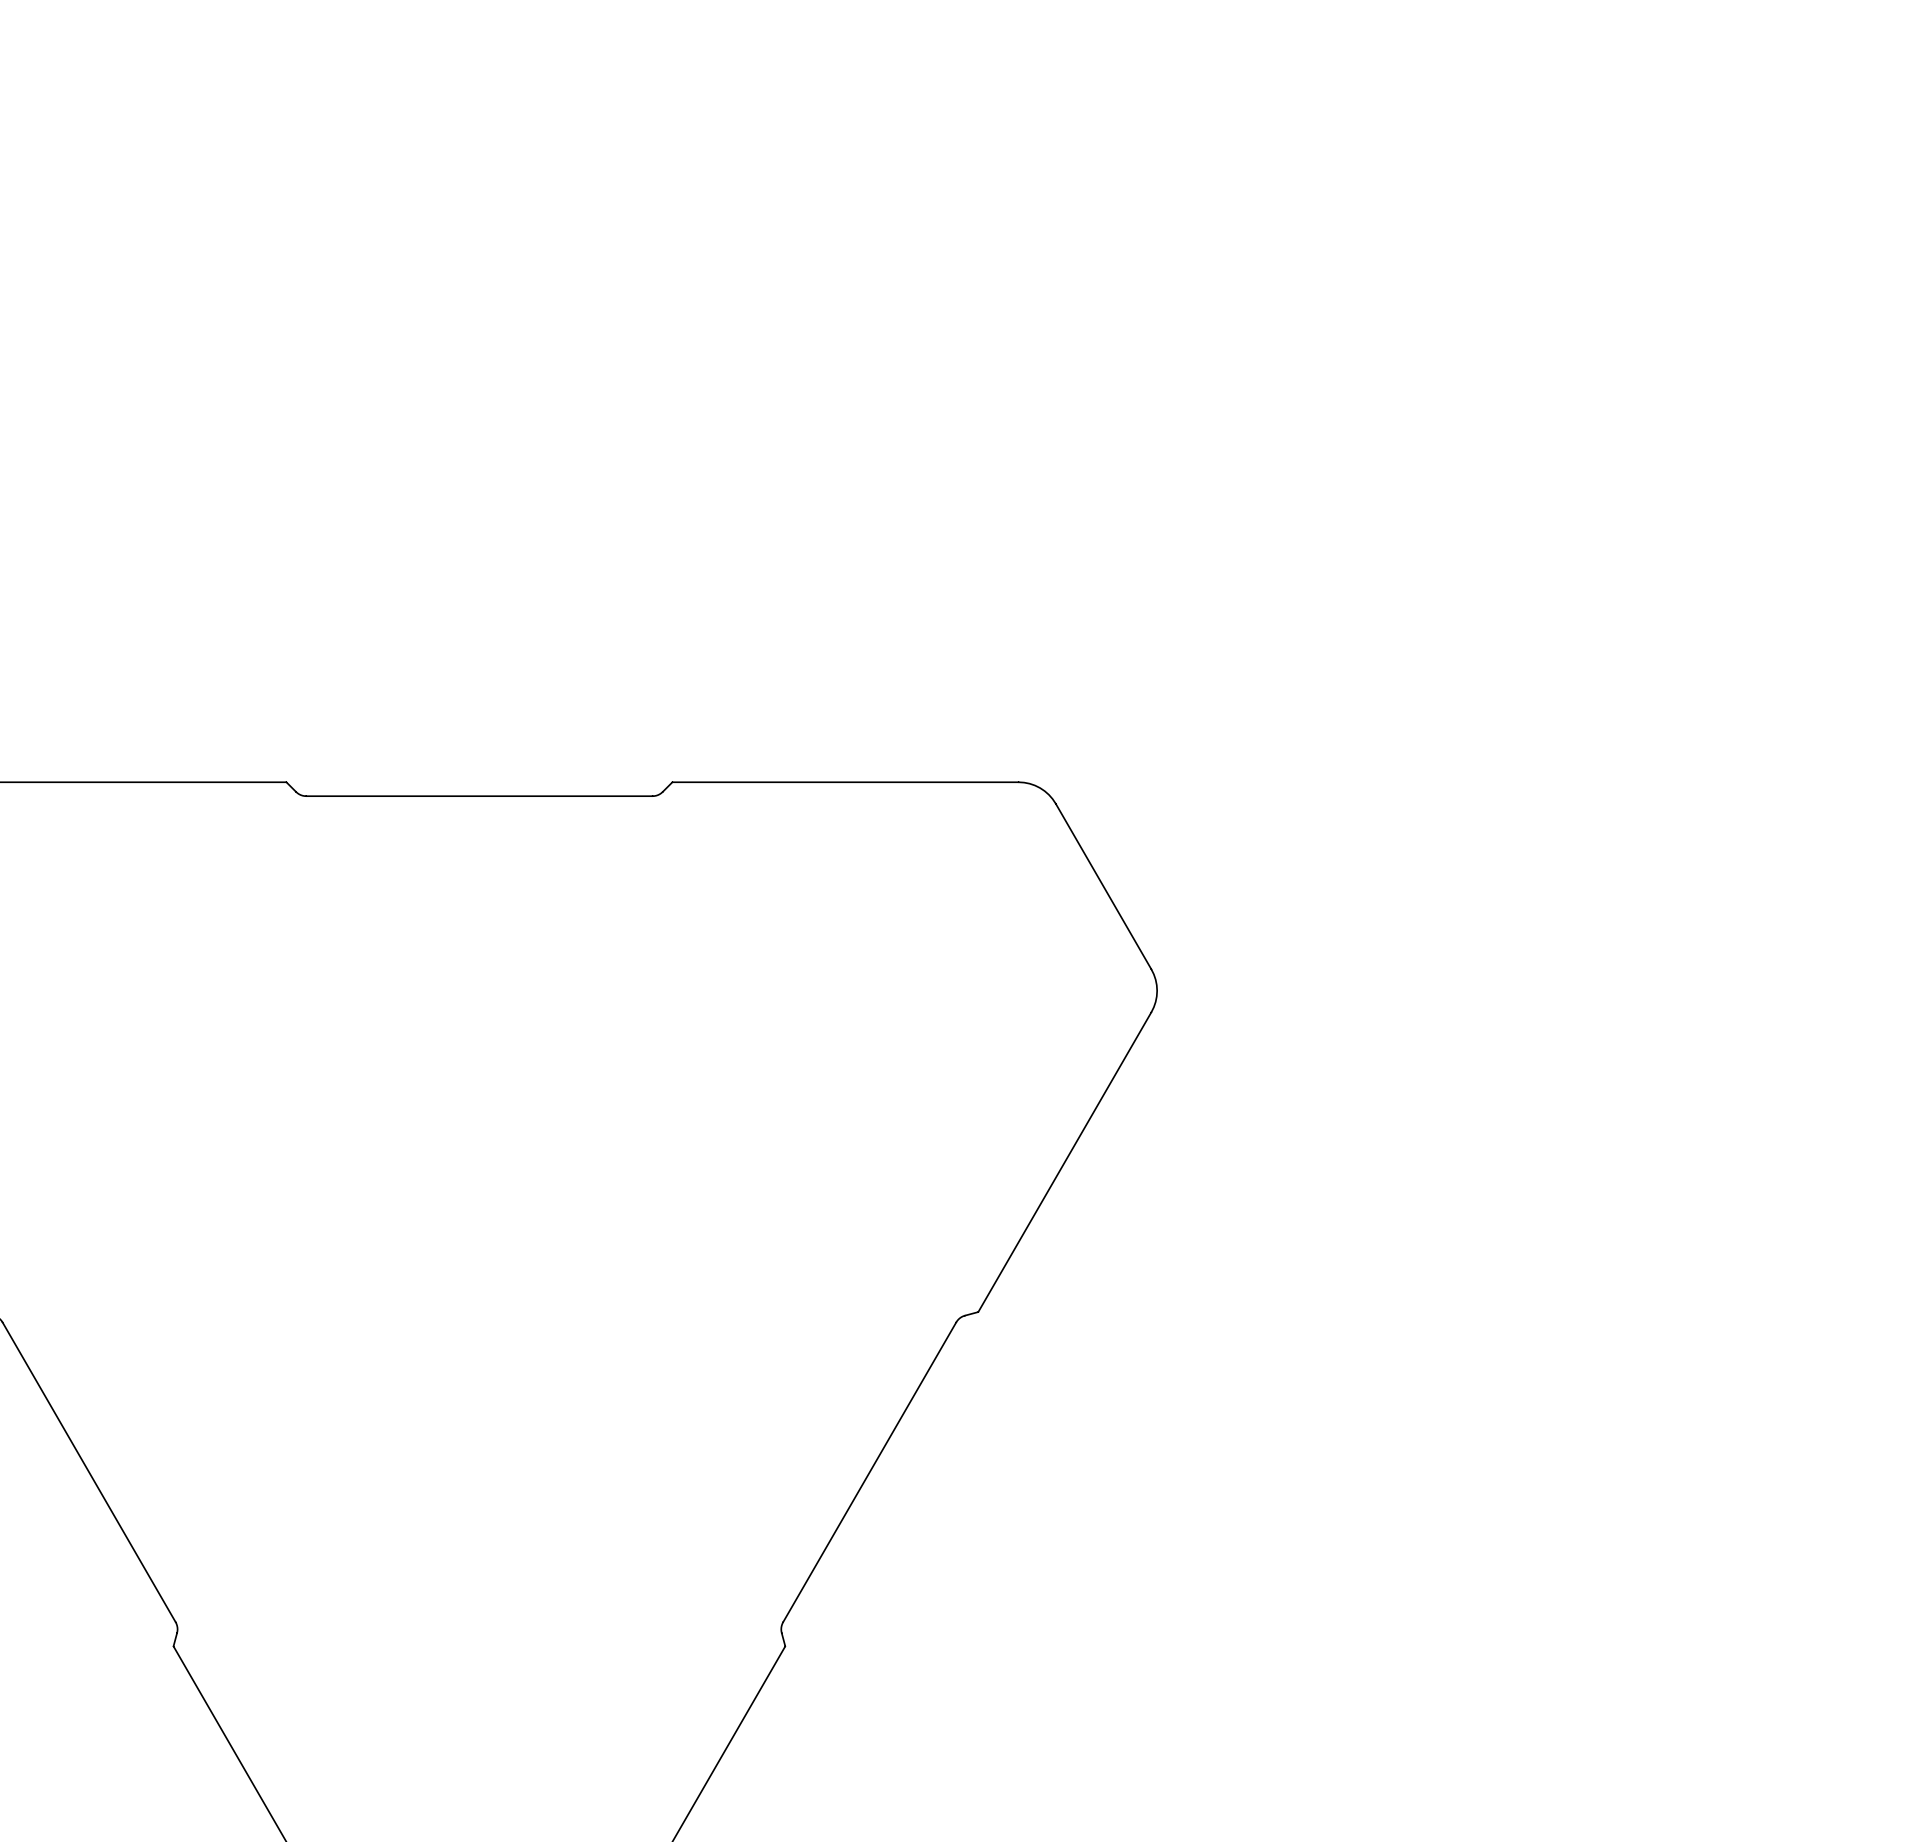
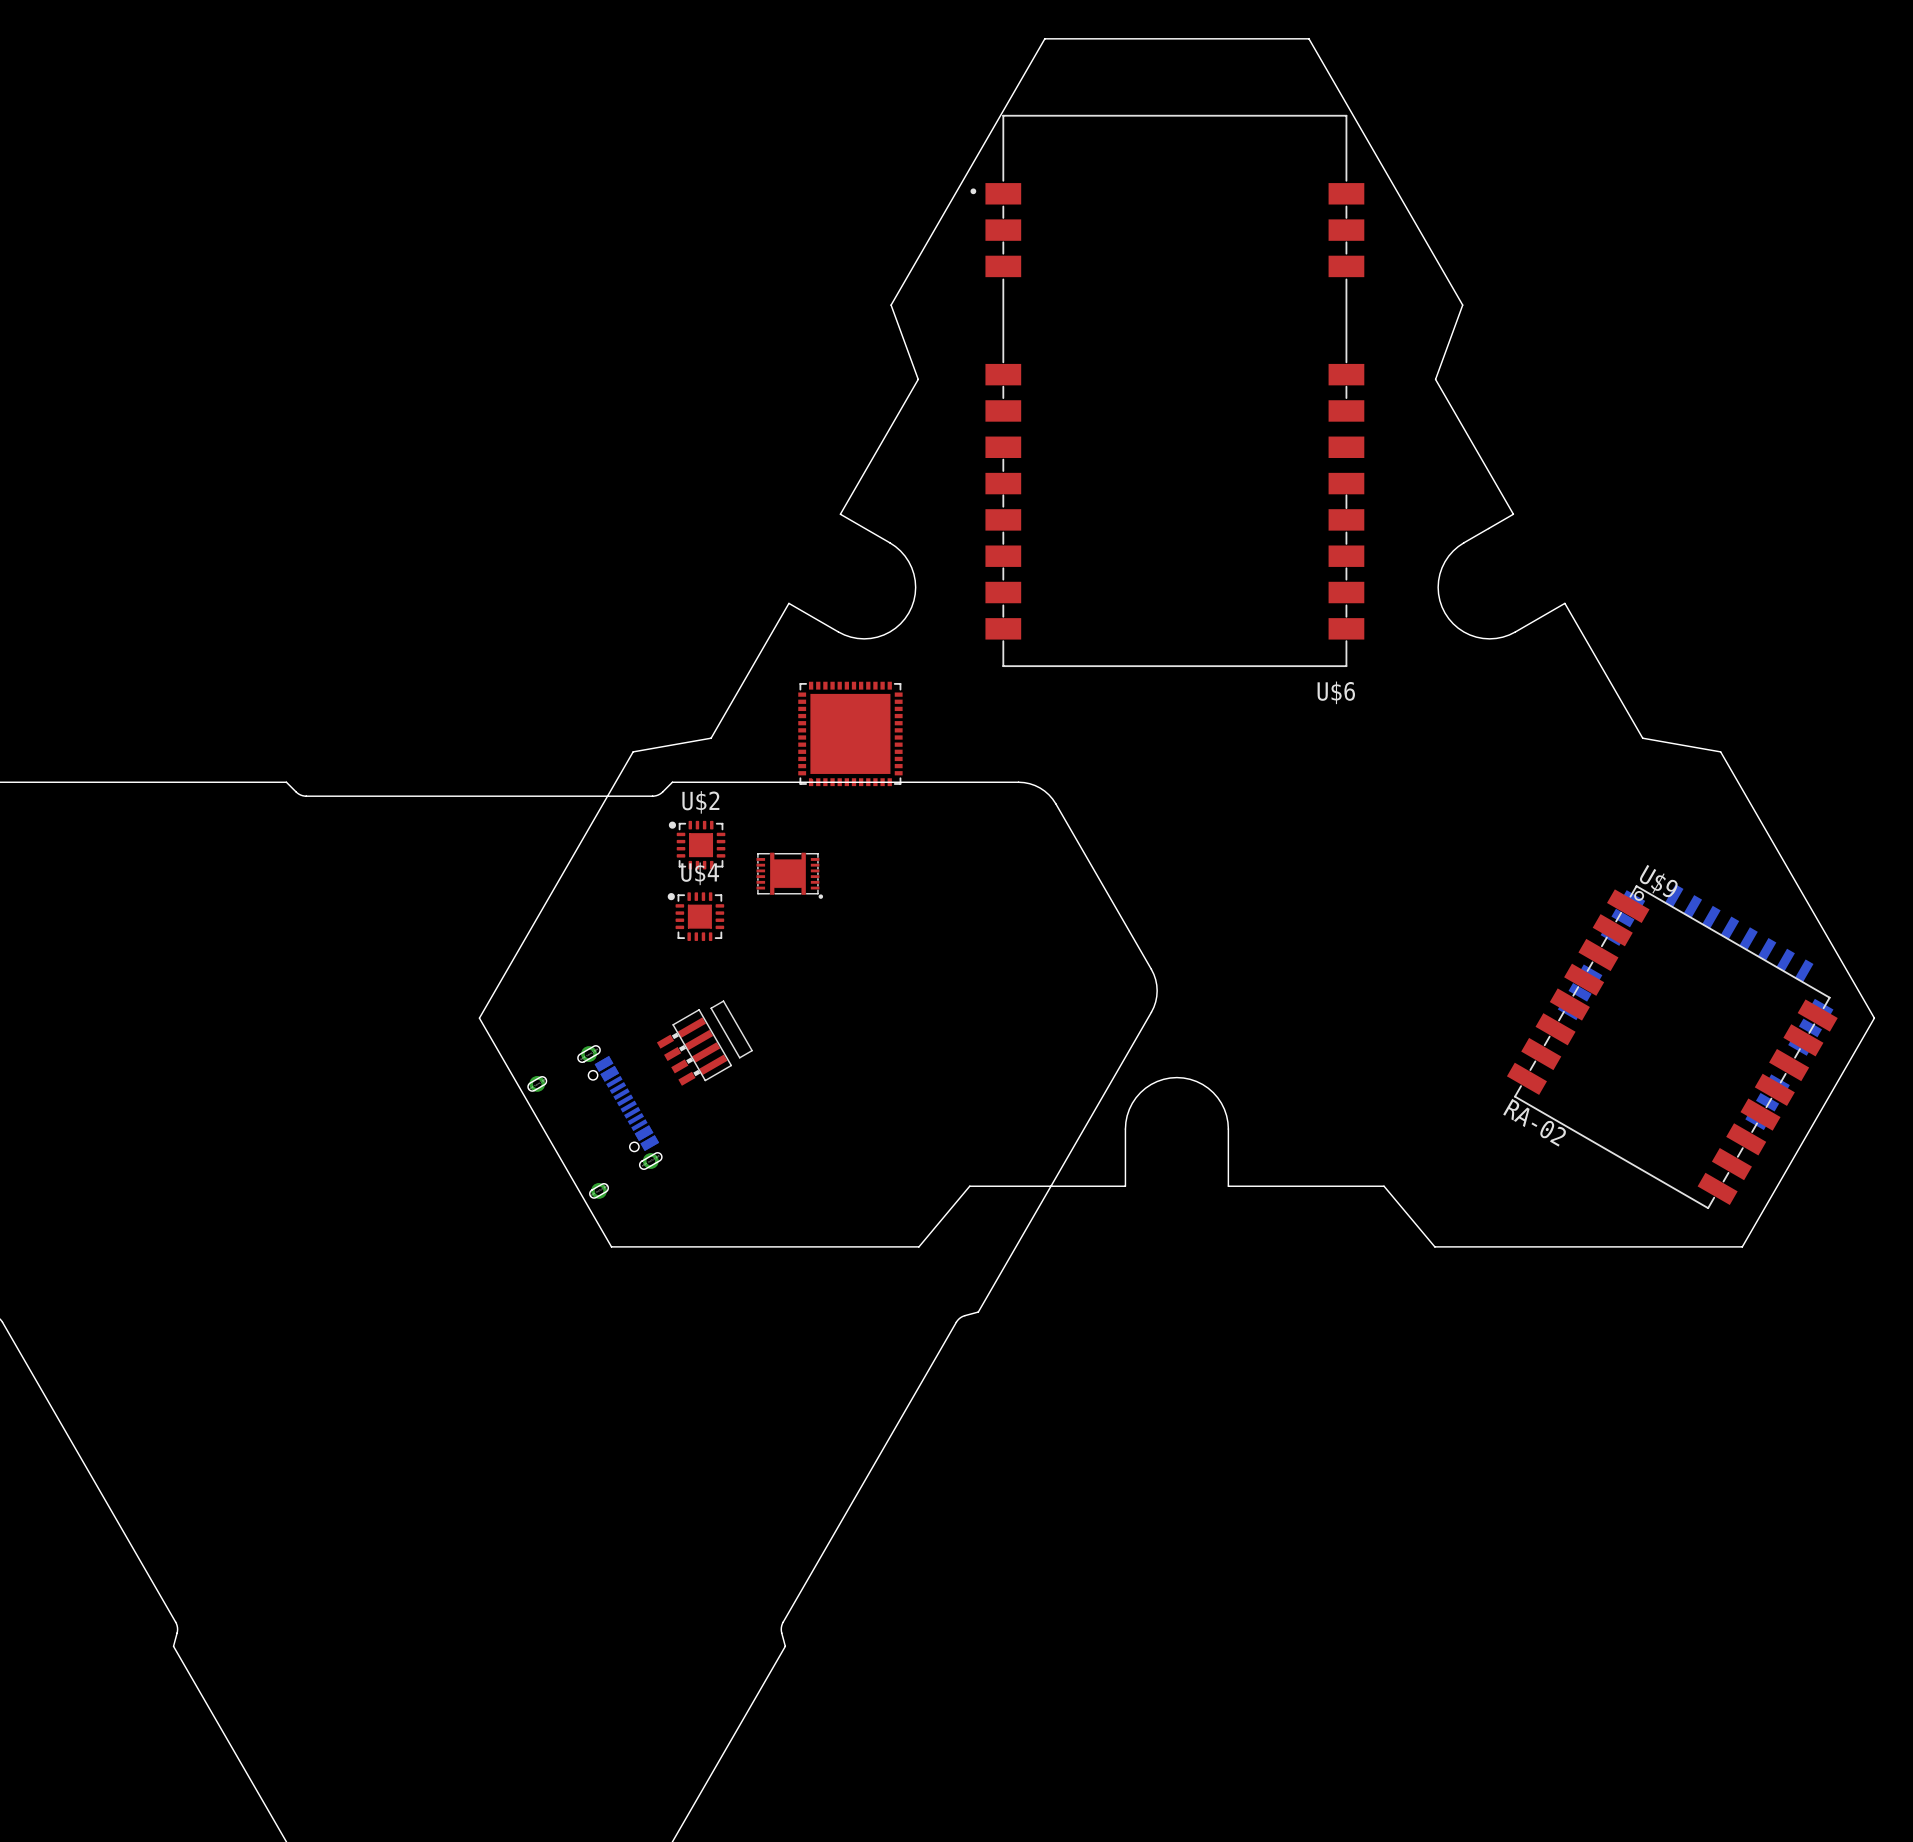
board edge: none -> (1044, 38) (1308, 38) (1462, 305) (1435, 379) (1513, 514) (1463, 542) (1448, 556) (1442, 567) (1438, 587) (1439, 600) (1445, 613) (1453, 623) (1469, 634) (1482, 638) (1496, 638) (1515, 631) (1564, 603) (1642, 738) (1720, 751) (1874, 1018) (1742, 1246) (1434, 1246) (1384, 1186) (1228, 1186) (1228, 1129) (1224, 1109) (1213, 1092) (1202, 1084) (1190, 1079) (1176, 1077) (1163, 1079) (1151, 1084) (1140, 1092) (1129, 1109) (1125, 1129) (1125, 1186) (969, 1186) (918, 1246) (611, 1246) (479, 1018) (633, 751) (711, 738) (788, 603) (838, 631) (857, 638) (870, 638) (883, 634) (900, 623) (908, 613) (913, 600) (915, 587) (911, 567) (905, 556) (889, 542) (840, 514) (918, 379) (891, 305) (1044, 38)
U$6: none -> (1167, 390)
part: none -> (850, 733)
U$2: none -> (697, 845)
part: none -> (789, 875)
U$4: none -> (695, 916)
part: none -> (1690, 1015)
part: none -> (715, 1037)
part: none -> (694, 1047)
U$9: none -> RA-02 (1672, 1047)
part: none -> (594, 1121)

